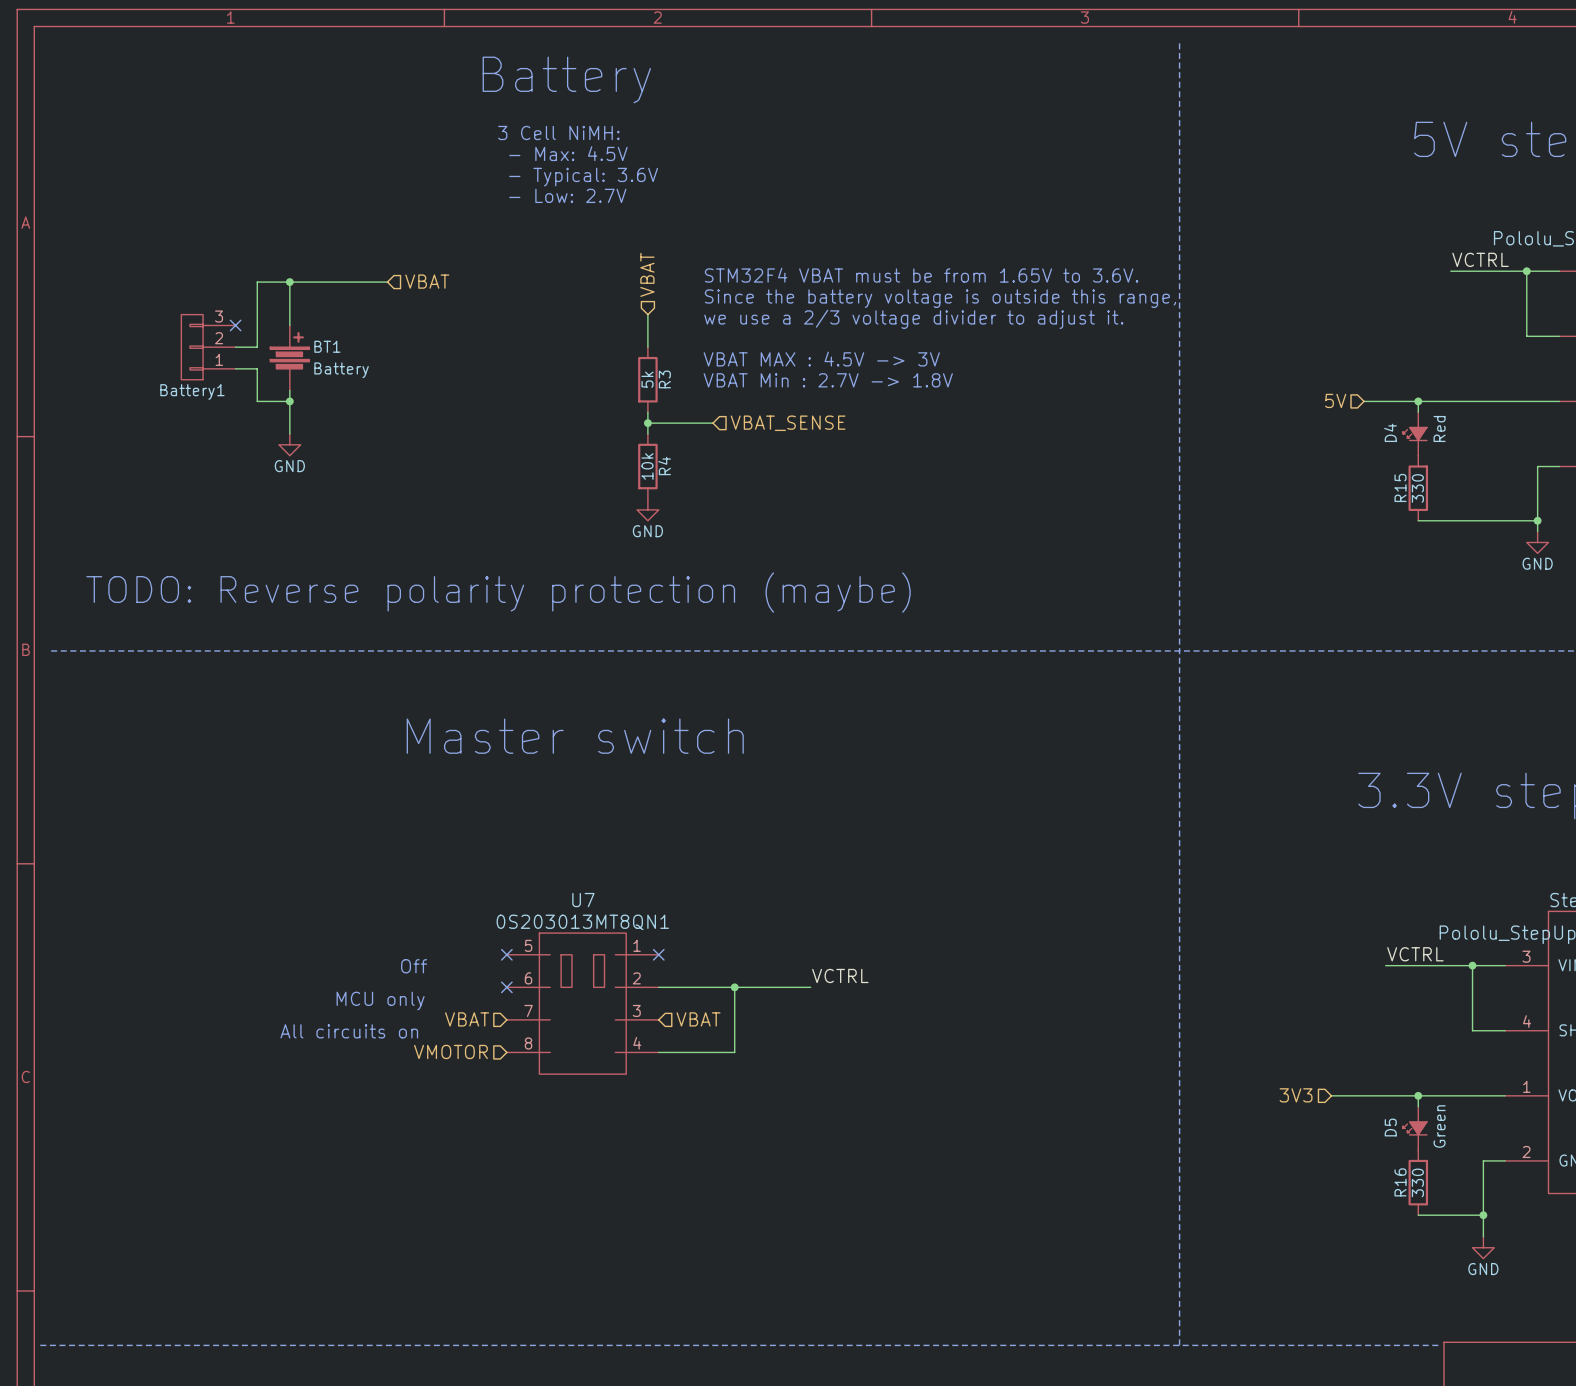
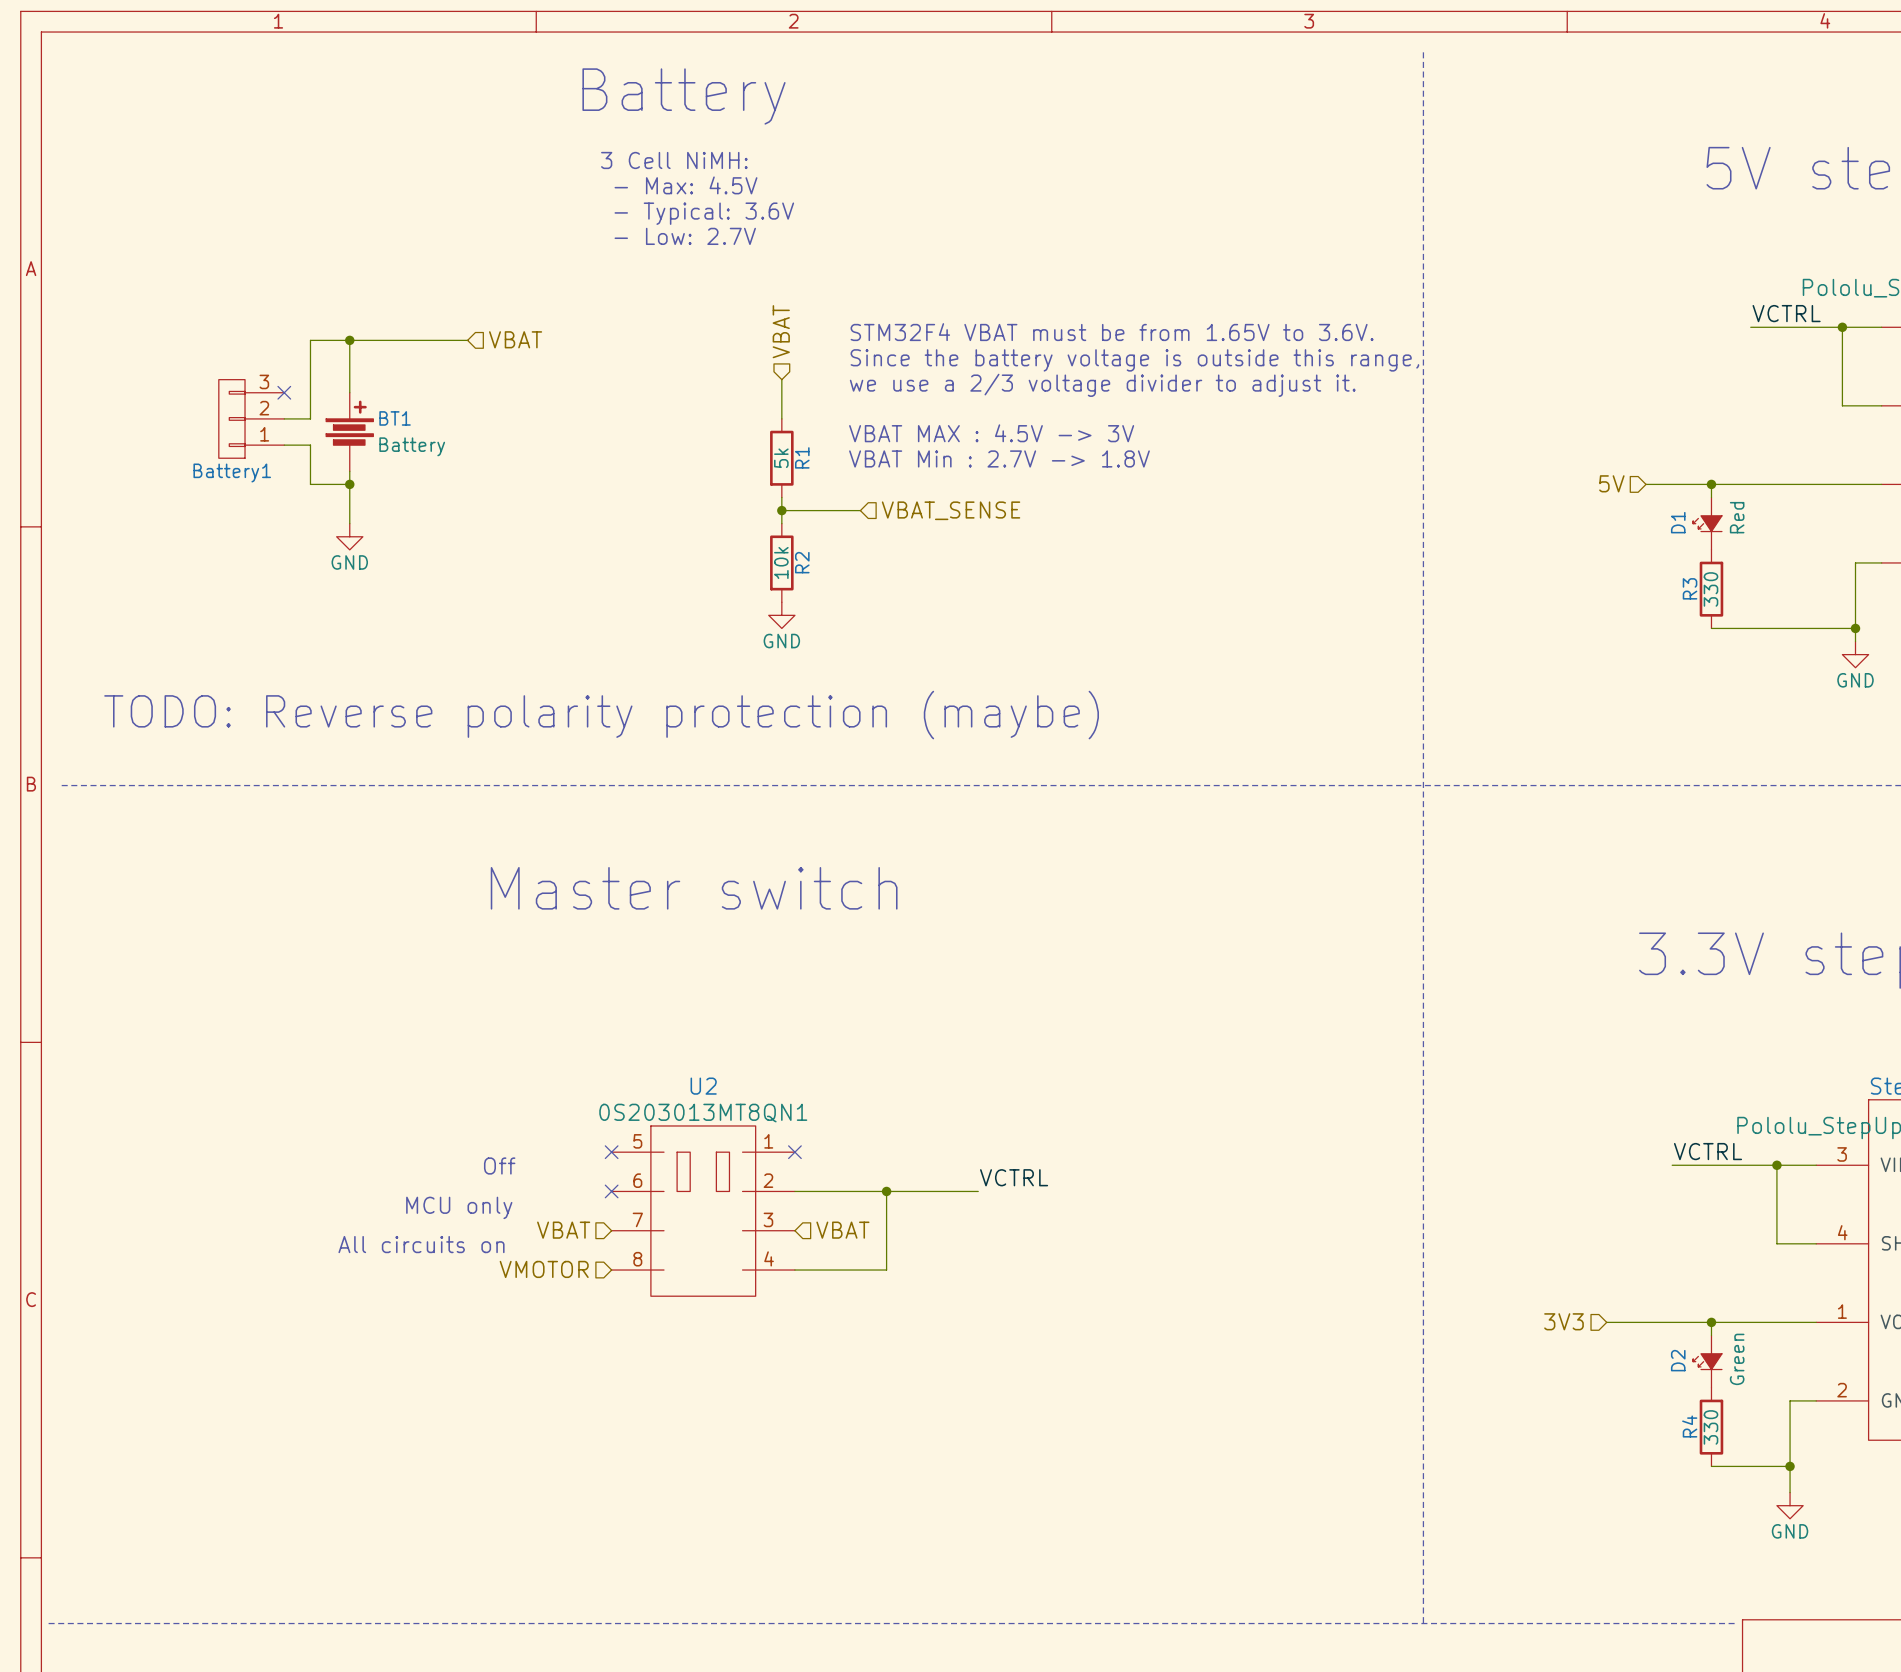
R3 name: R3 (664, 379) -> R1 (802, 457)
D4 name: D4 (1390, 432) -> D1 (1678, 522)
R4 name: R4 (664, 466) -> R2 (802, 562)
R15 name: R15 (1400, 487) -> R3 (1690, 588)
U7 name: U7 (583, 900) -> U2 (703, 1086)
D5 name: D5 (1390, 1127) -> D2 (1678, 1360)
R16 name: R16 (1400, 1182) -> R4 (1689, 1426)

